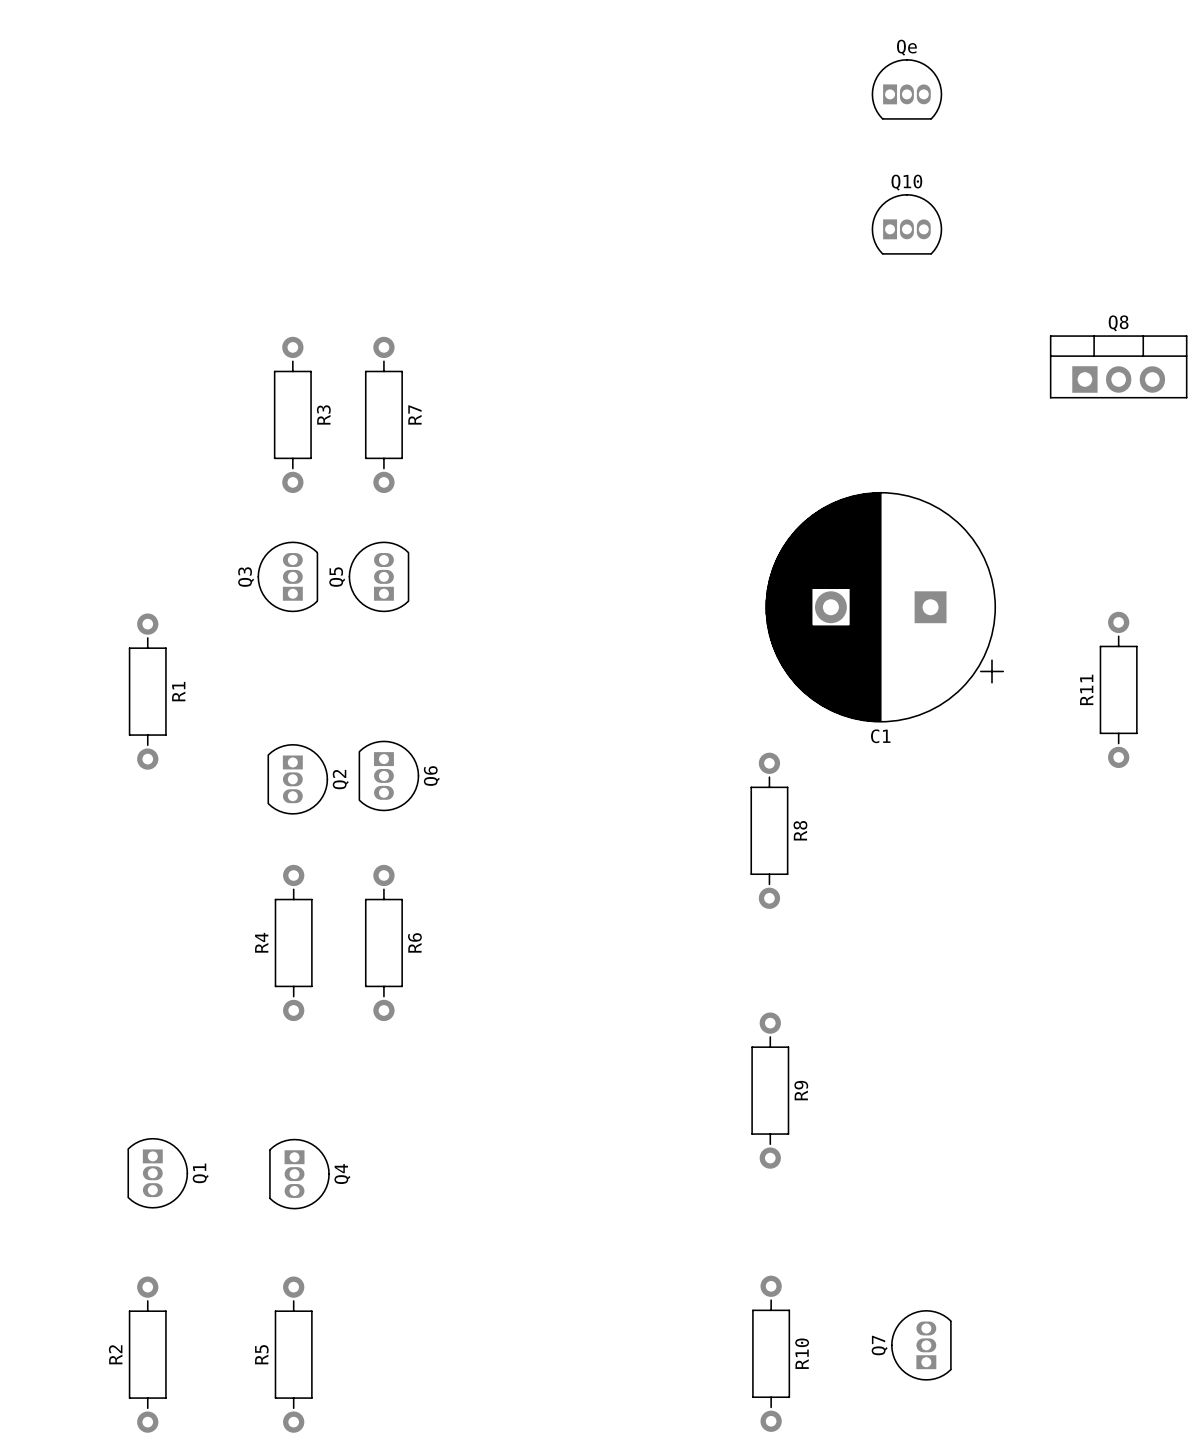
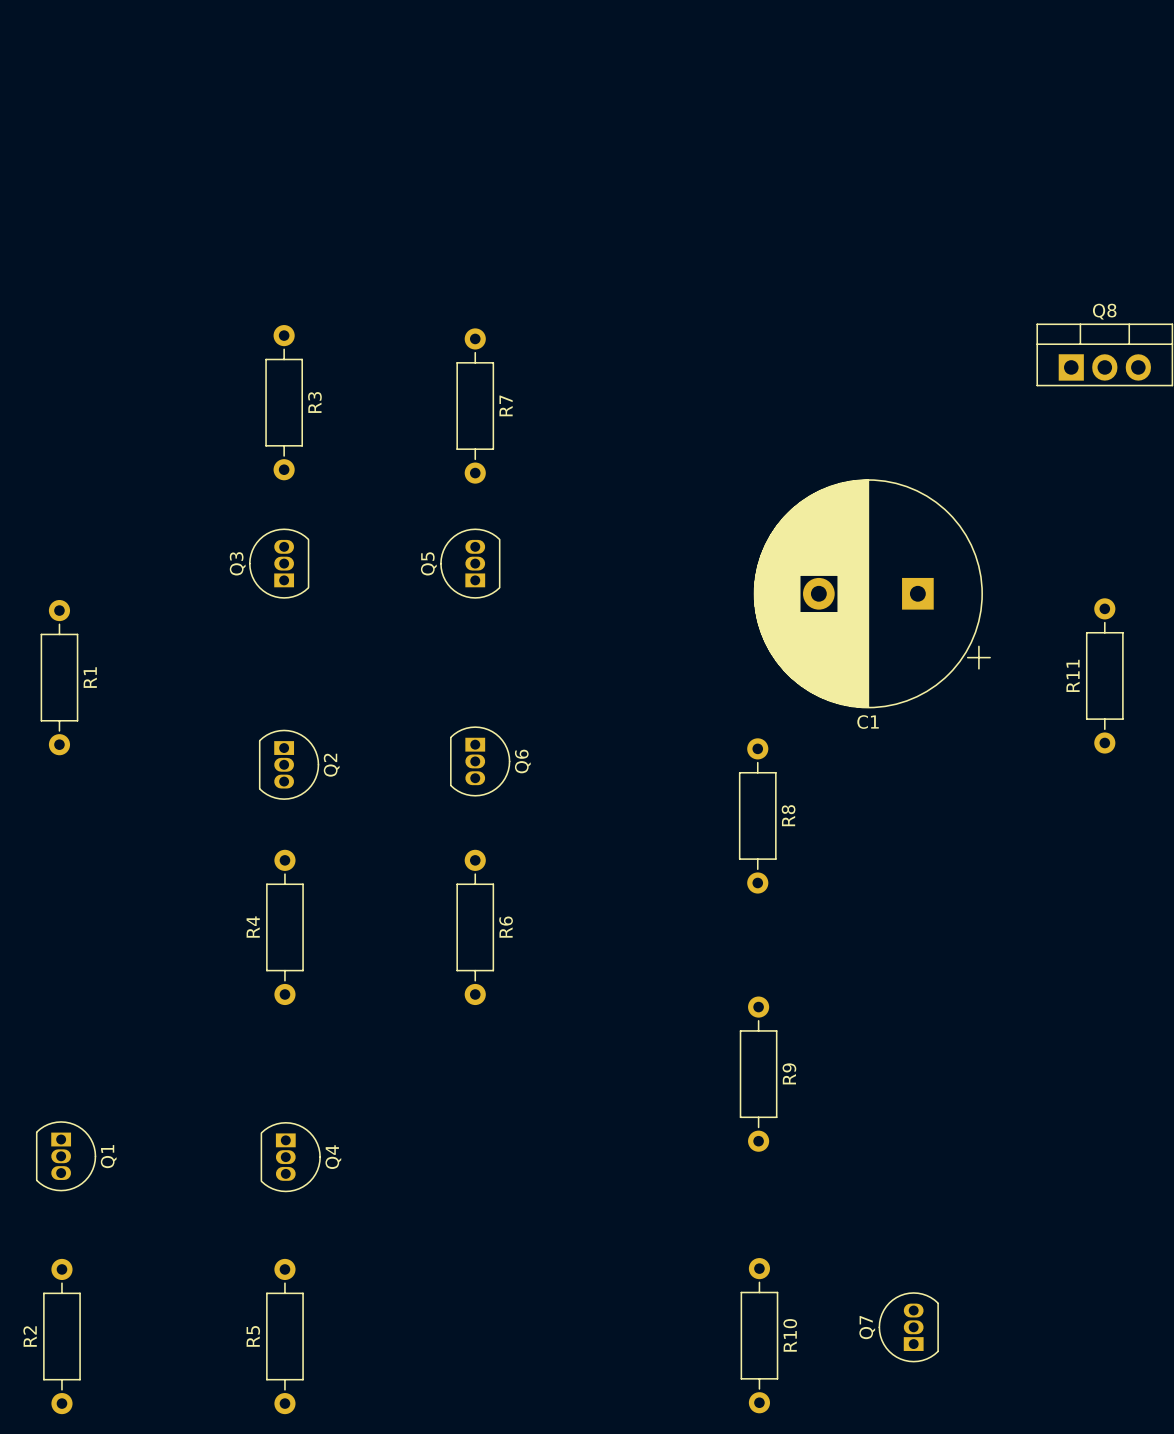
Qe: (906, 89) -> none
Q10: (906, 224) -> none
R7 position: (383, 414) -> (475, 406)
Q5 position: (378, 576) -> (470, 563)
R1 position: (147, 691) -> (59, 677)
Q6 position: (388, 775) -> (480, 761)
R6 position: (383, 942) -> (475, 927)
Q1 position: (157, 1173) -> (66, 1156)
R2 position: (147, 1354) -> (61, 1336)

